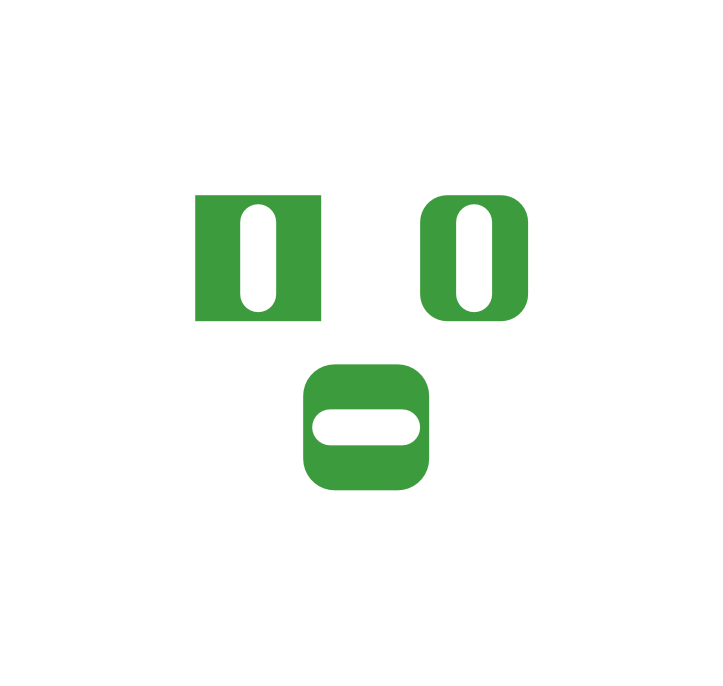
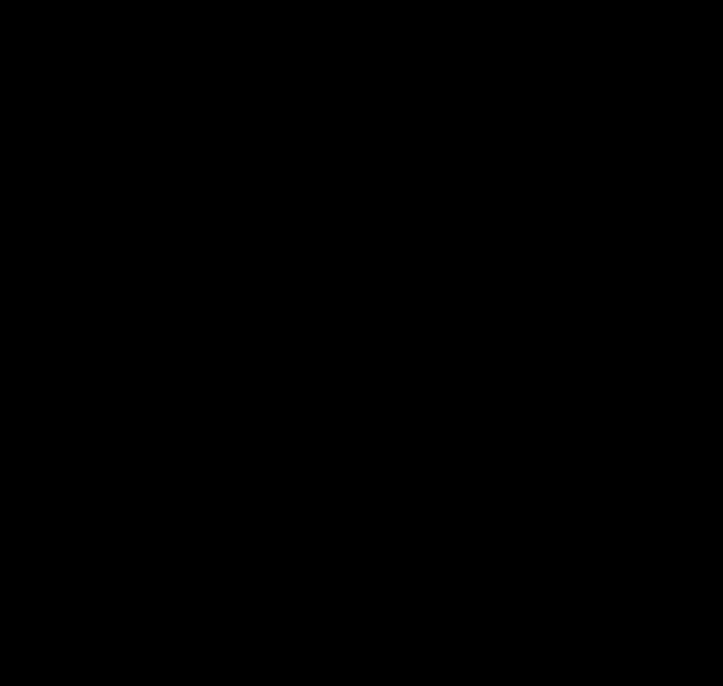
part: (361, 342) -> none

